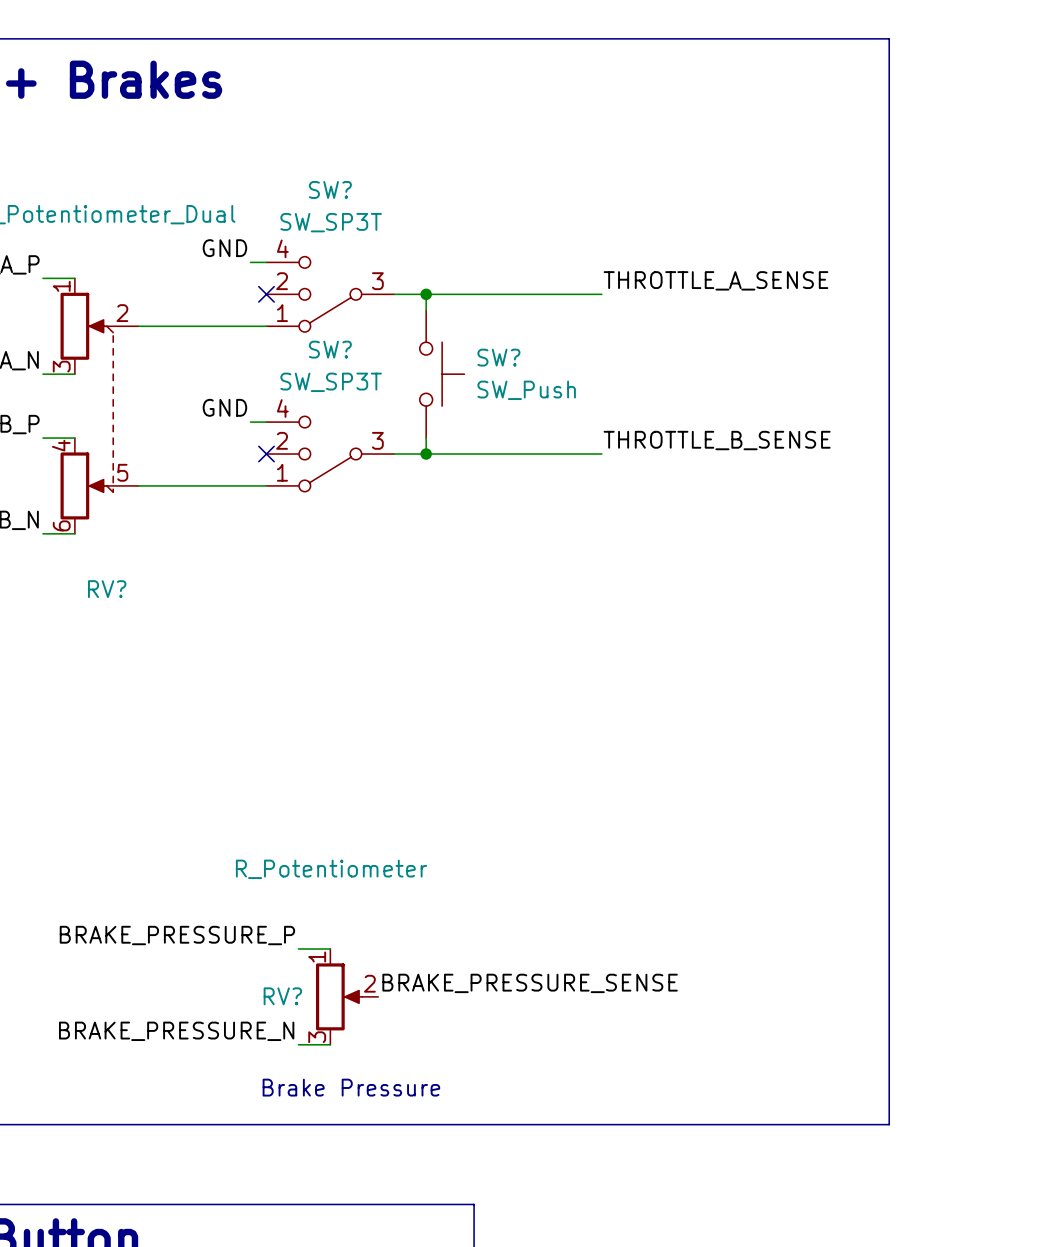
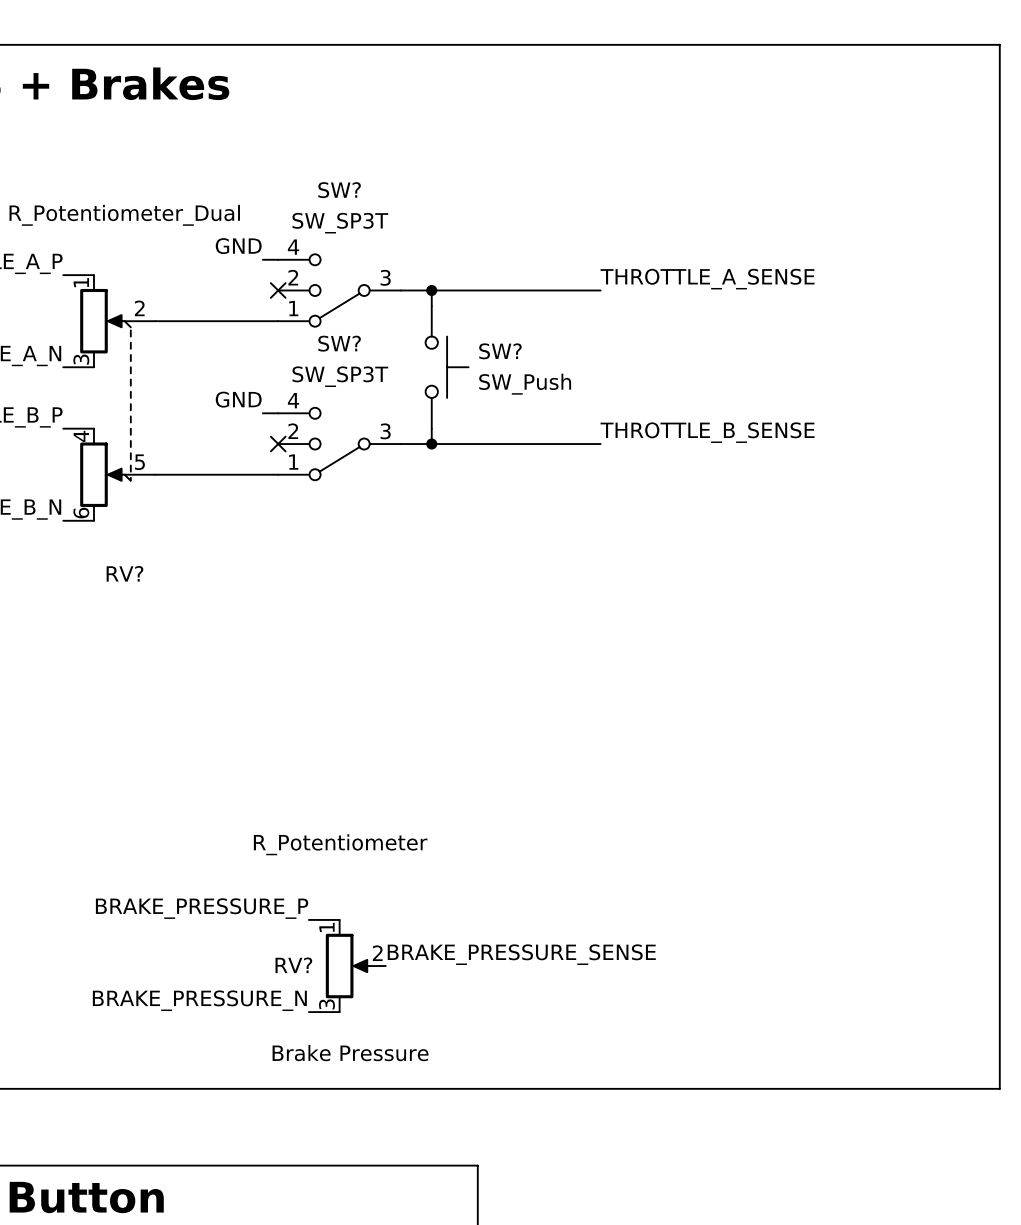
line: (889, 38) (889, 1124) -> (876, 44) (999, 44) (999, 1088) (876, 1088)

